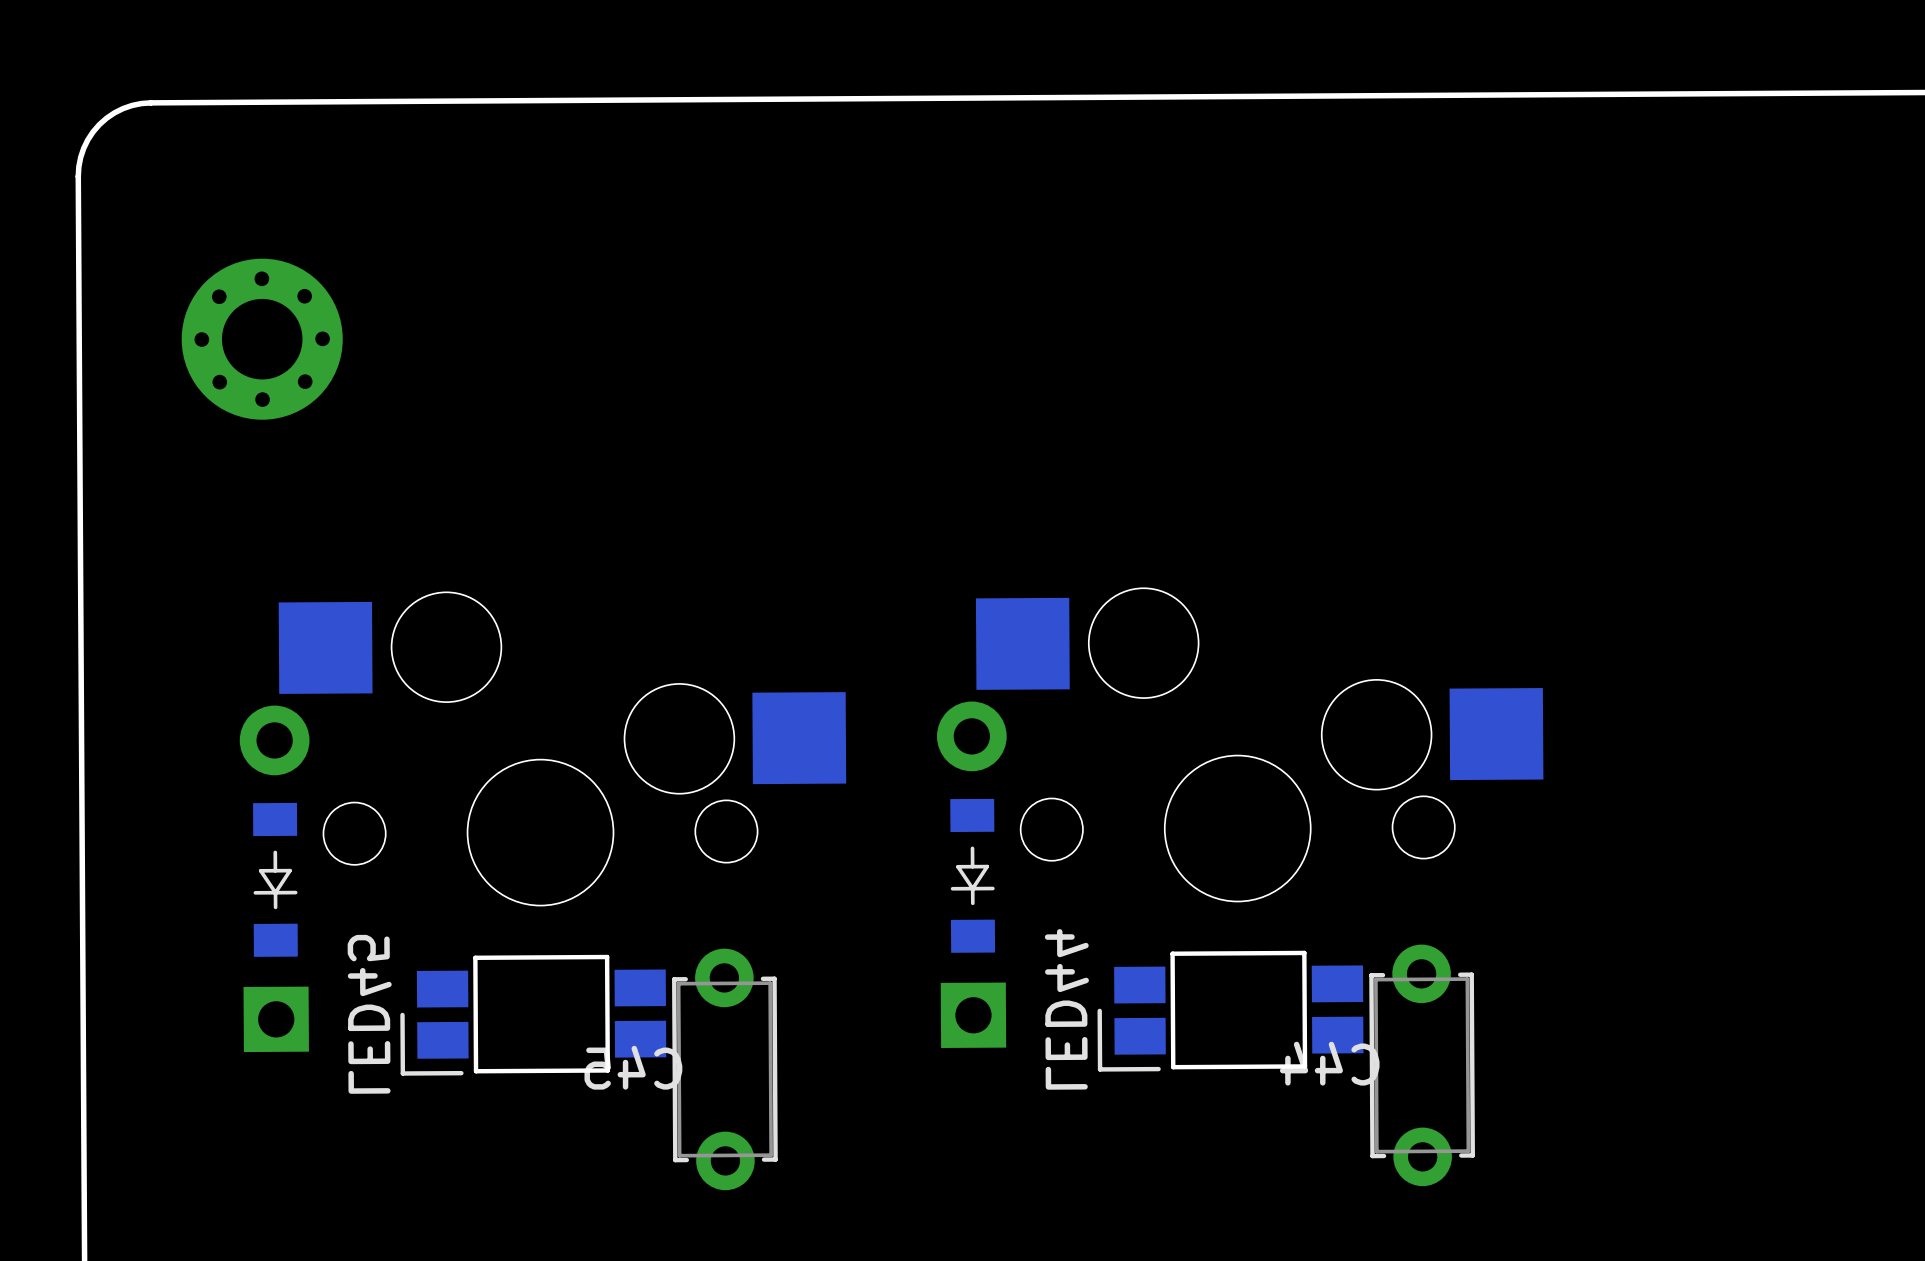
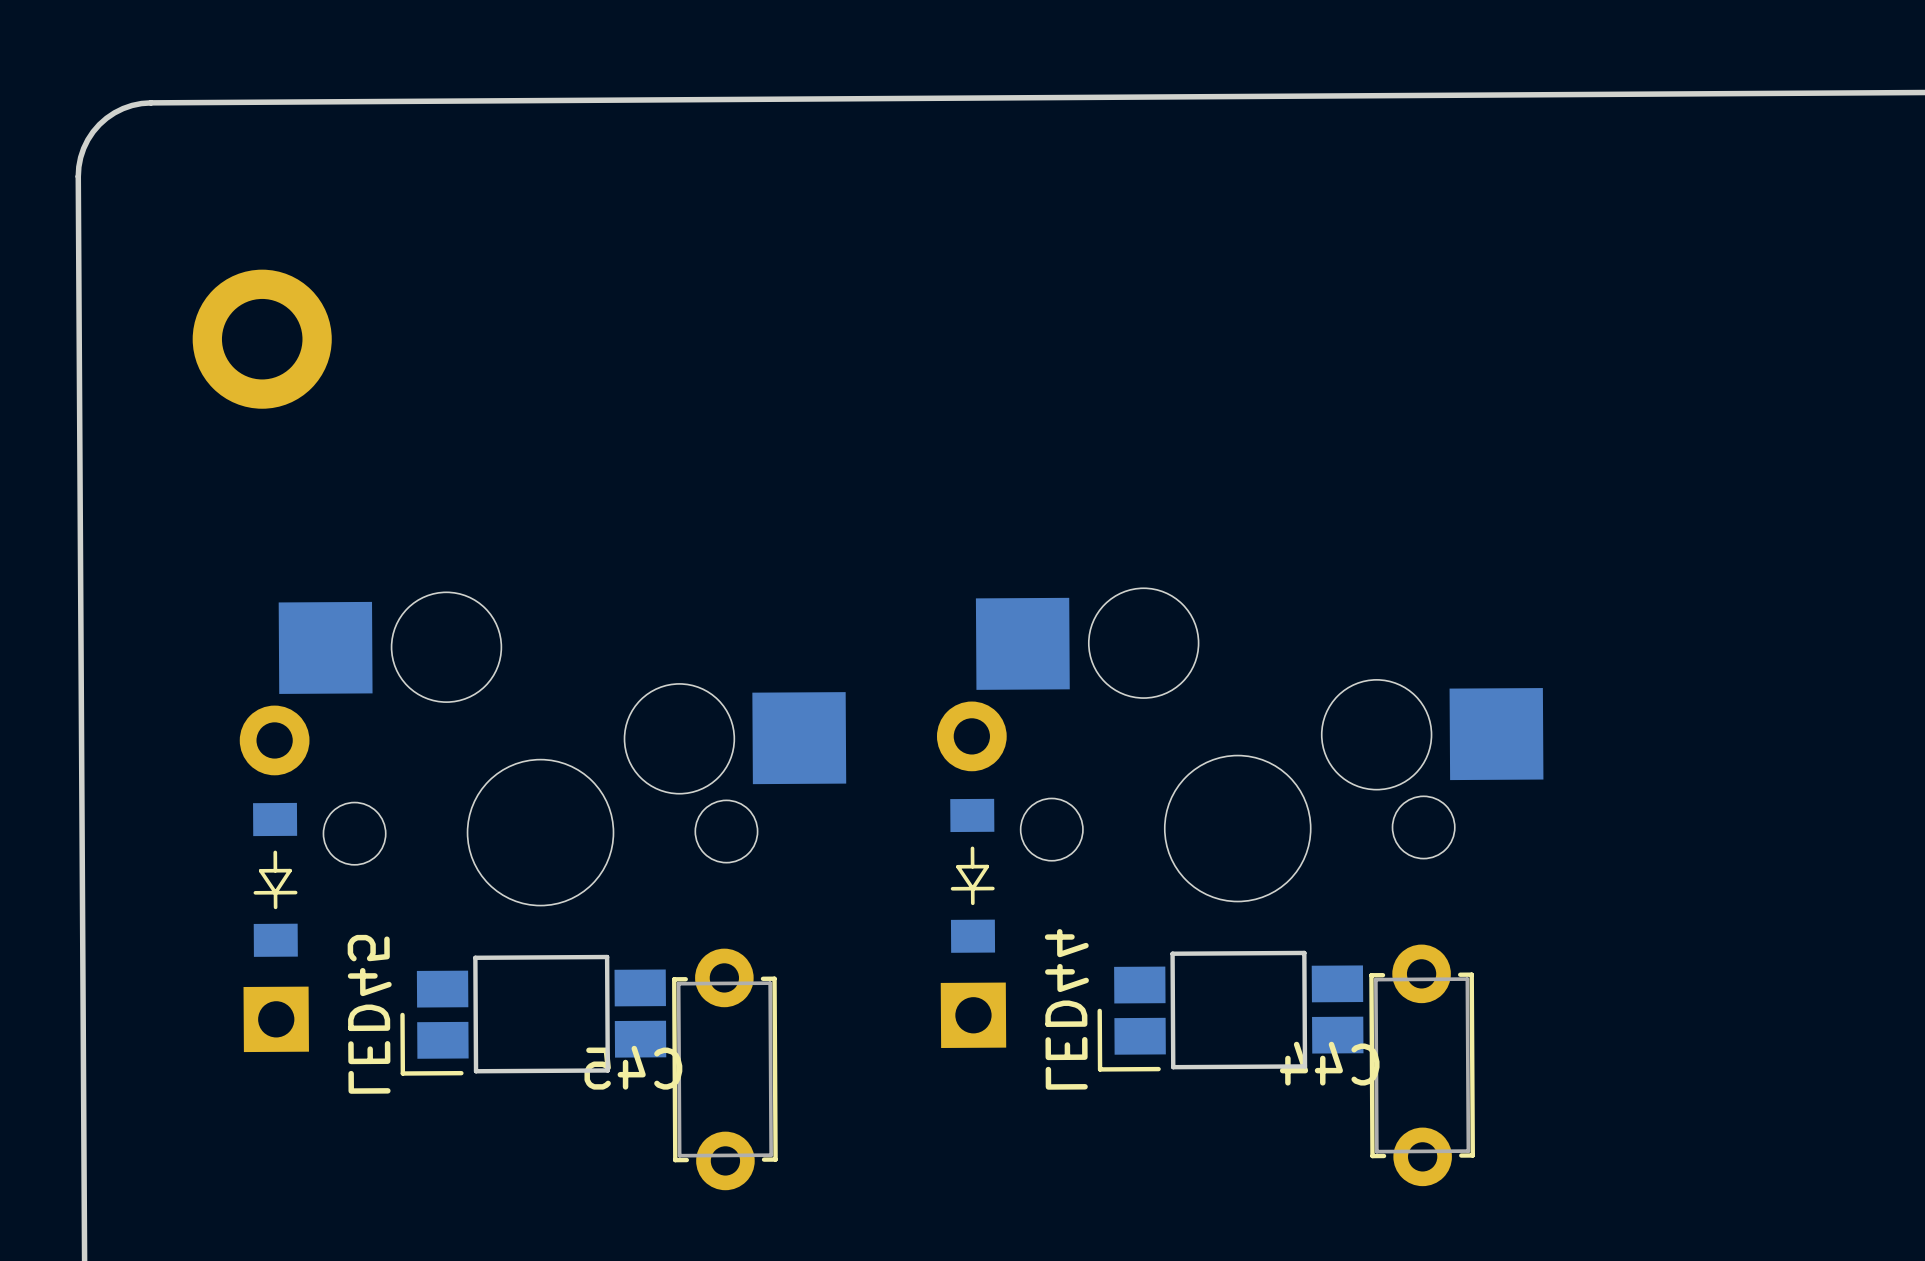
part footprint: [181, 258, 343, 420] -> [192, 269, 332, 409]

